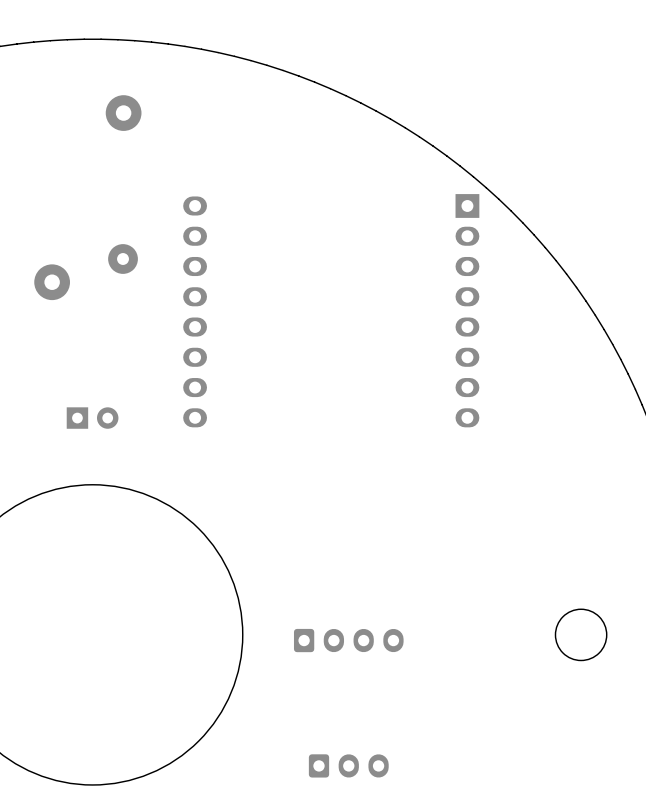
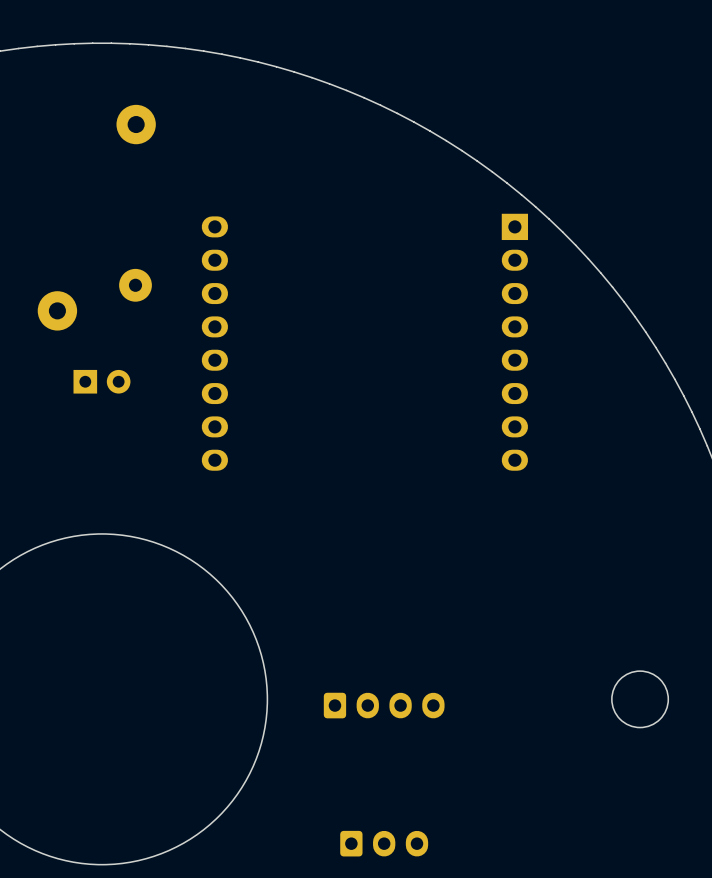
part position: (92, 418) -> (101, 381)

